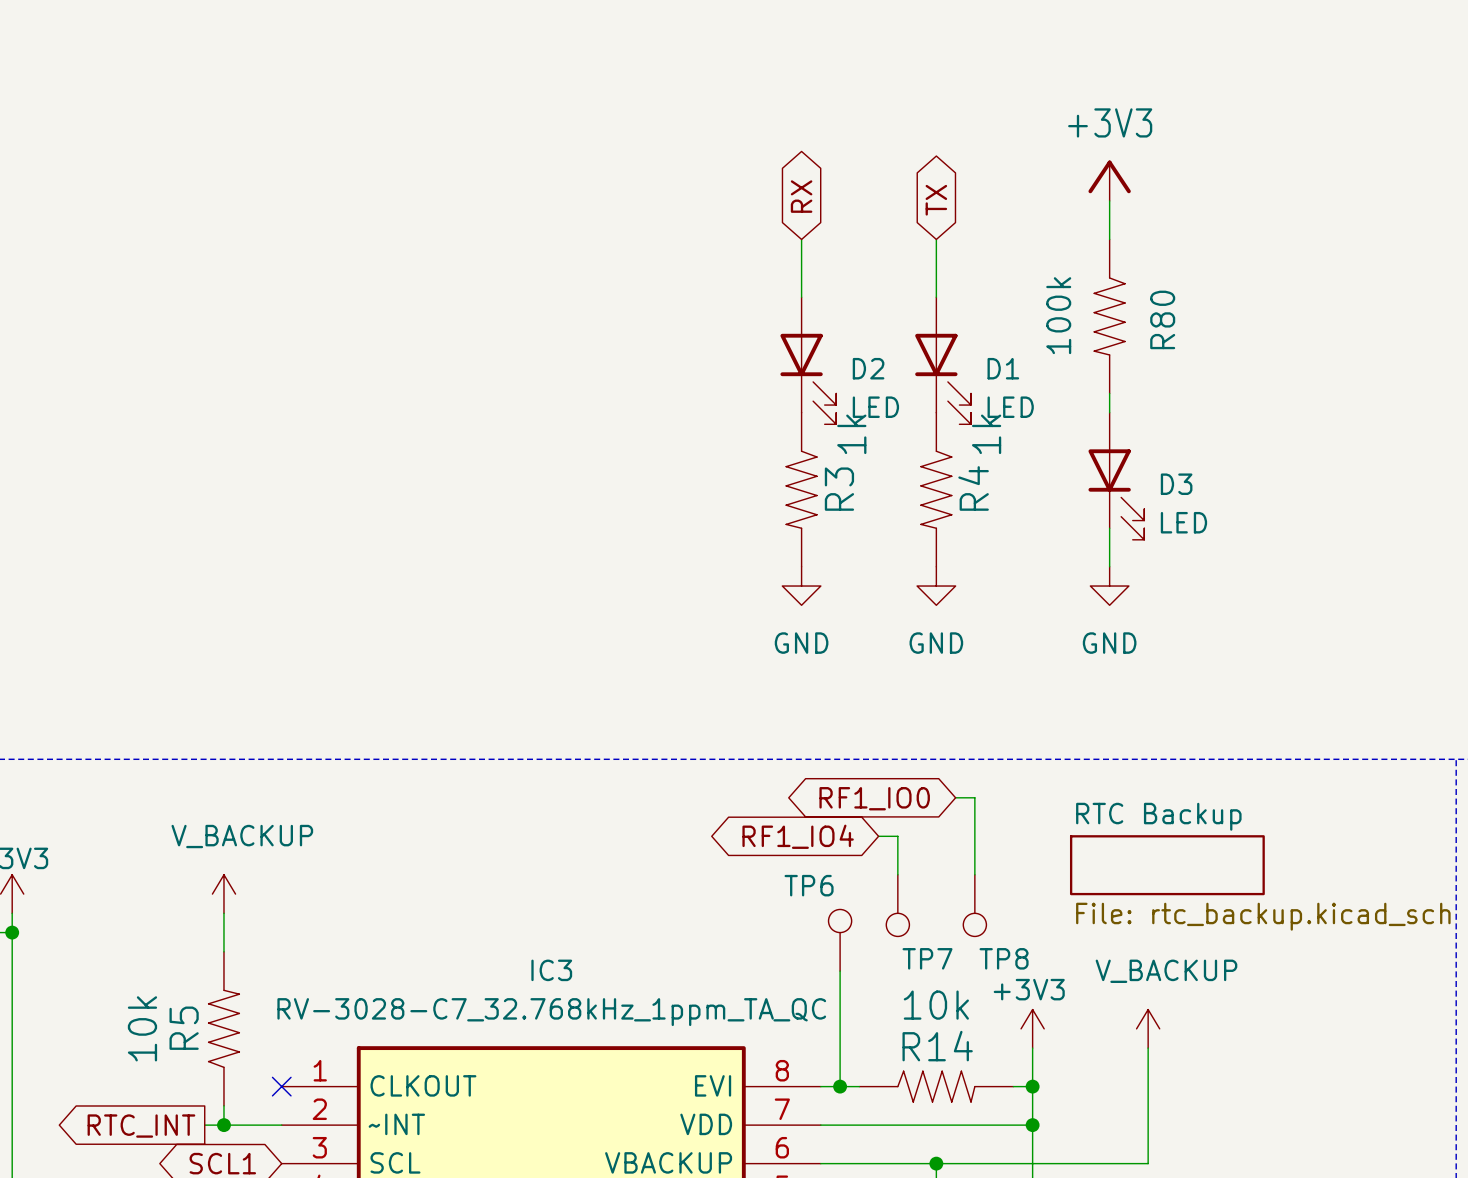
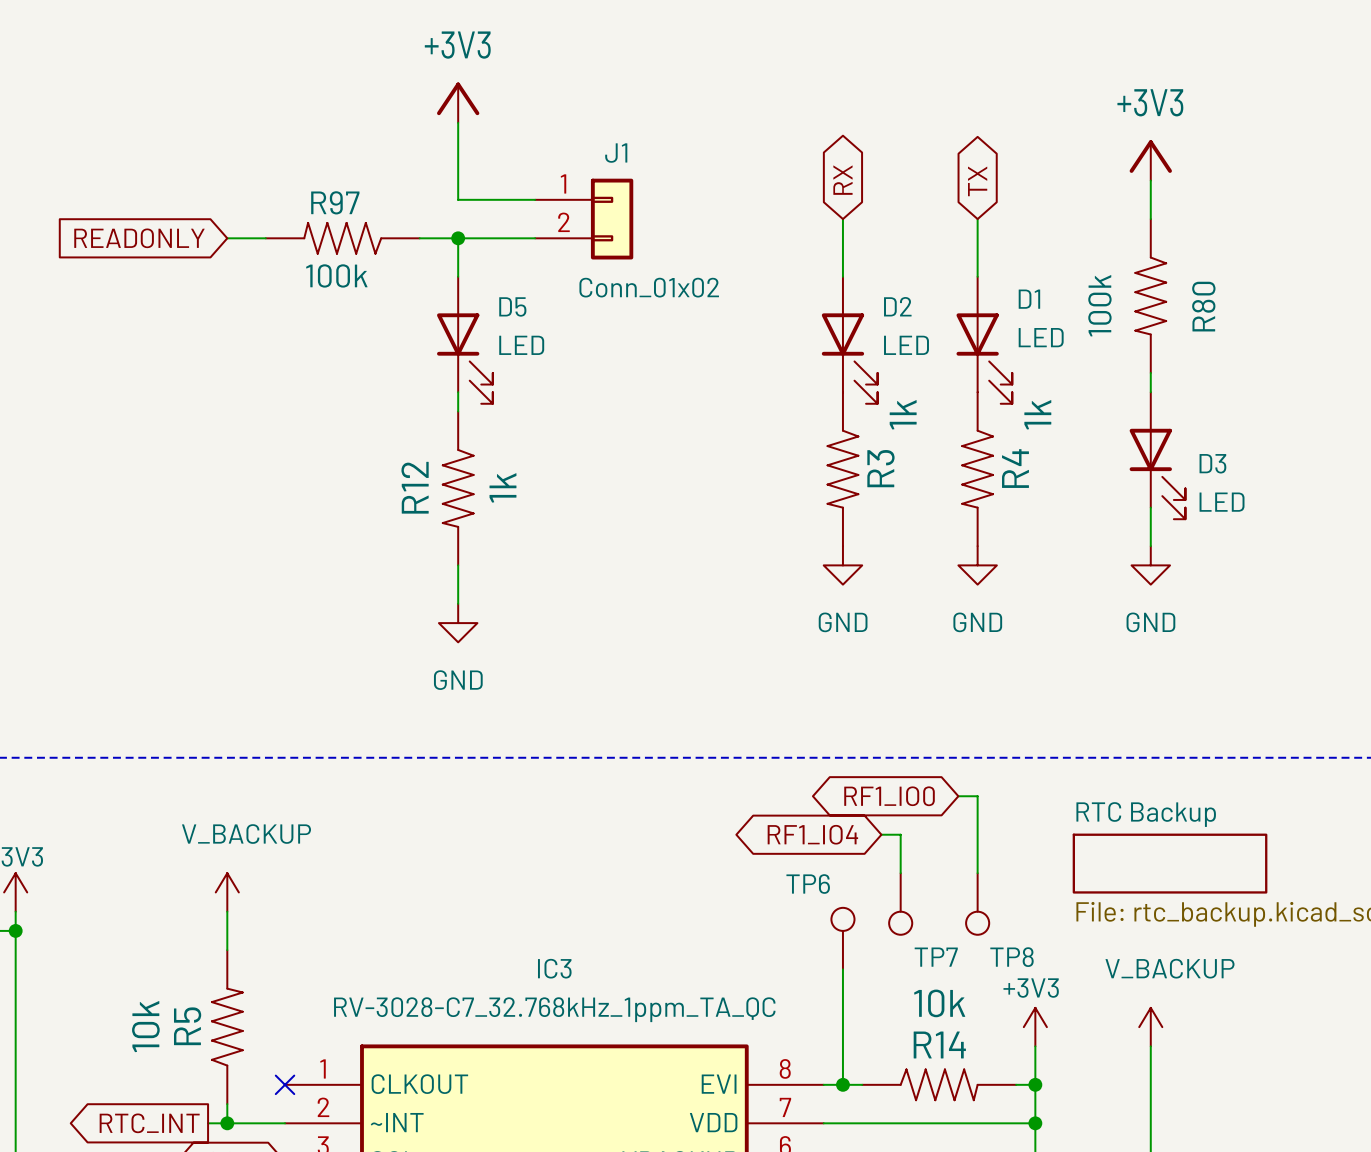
power symbol: none -> +3V3 (458, 102)
wire: none -> (458, 122) (458, 199) (535, 199)
power symbol position: +3V3 (1109, 180) -> +3V3 (1150, 160)
global label position: RX (801, 196) -> RX (842, 180)
global label position: TX (936, 200) -> TX (977, 181)
wire: (1109, 200) (1109, 239) -> (1150, 180) (1150, 219)
J1: none -> Conn_01x02 (584, 219)
global label: none -> READONLY (139, 238)
wire: none -> (227, 238) (265, 238)
R97: none -> 100k (342, 238)
wire: none -> (419, 238) (535, 238)
wire: none -> (458, 238) (458, 276)
junction: none -> (458, 238)
wire: (801, 239) (801, 297) -> (842, 219) (842, 276)
wire: (936, 239) (936, 297) -> (977, 219) (977, 276)
R80 position: (1109, 316) -> (1150, 296)
D5: none -> LED (464, 340)
D2 position: (808, 360) -> (849, 340)
D1 position: (943, 360) -> (984, 340)
D2 name position: D2 (868, 368) -> D2 (897, 306)
D1 name position: D1 (1003, 368) -> D1 (1029, 299)
wire: none -> (458, 392) (458, 411)
wire: (1109, 393) (1109, 412) -> (1150, 372) (1150, 392)
D2 value position: LED (875, 407) -> LED (906, 345)
D1 value position: LED (1010, 407) -> LED (1041, 337)
R3 value position: 1k (851, 434) -> 1k (903, 414)
R4 value position: 1k (986, 434) -> 1k (1037, 414)
D3 position: (1116, 476) -> (1157, 455)
R12: none -> 1k (458, 488)
R3 position: (801, 489) -> (842, 469)
R4 position: (936, 489) -> (977, 469)
wire: (1109, 528) (1109, 566) -> (1150, 507) (1150, 546)
wire: none -> (458, 565) (458, 603)
power symbol position: GND (801, 586) -> GND (842, 565)
power symbol position: GND (936, 586) -> GND (977, 565)
power symbol position: GND (1109, 586) -> GND (1150, 565)
power symbol: none -> GND (458, 623)

